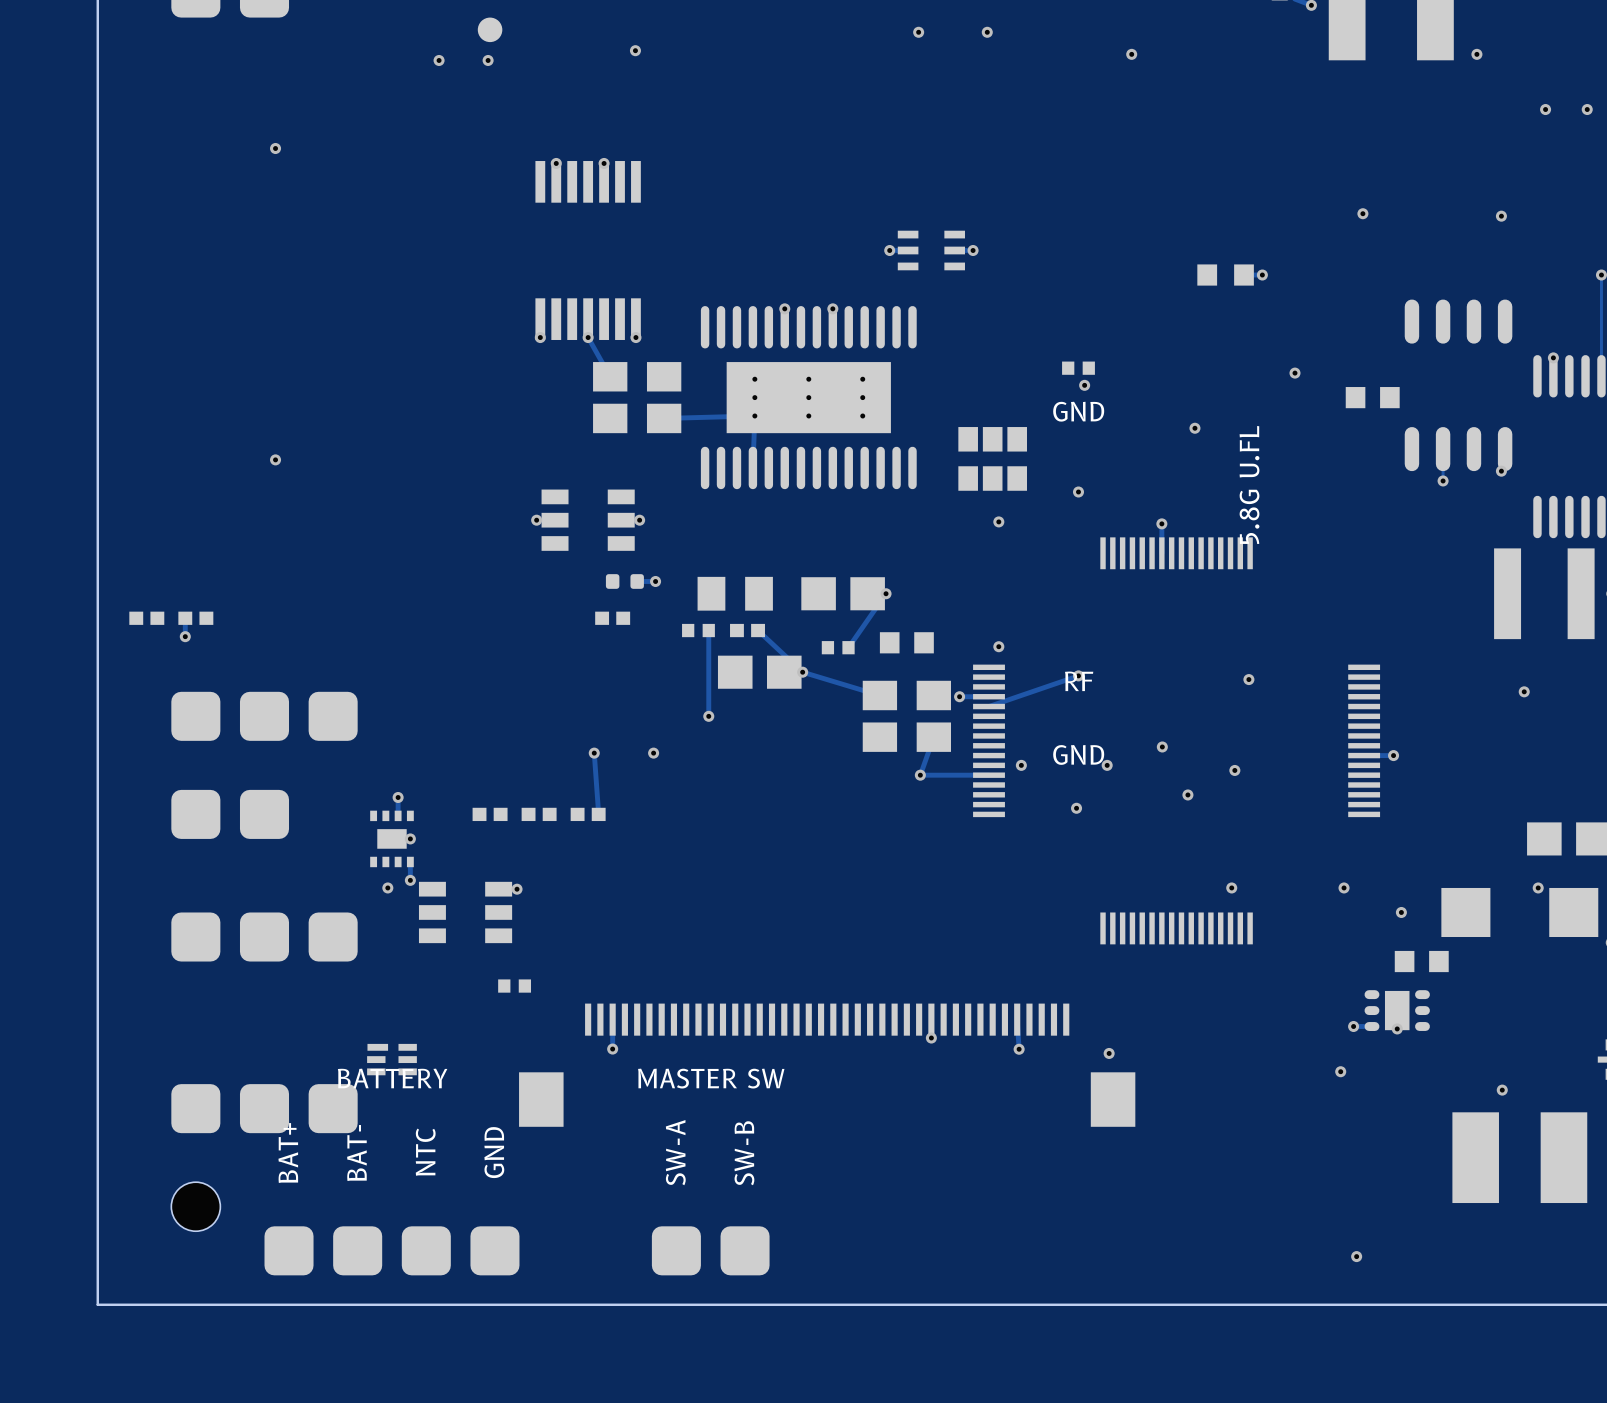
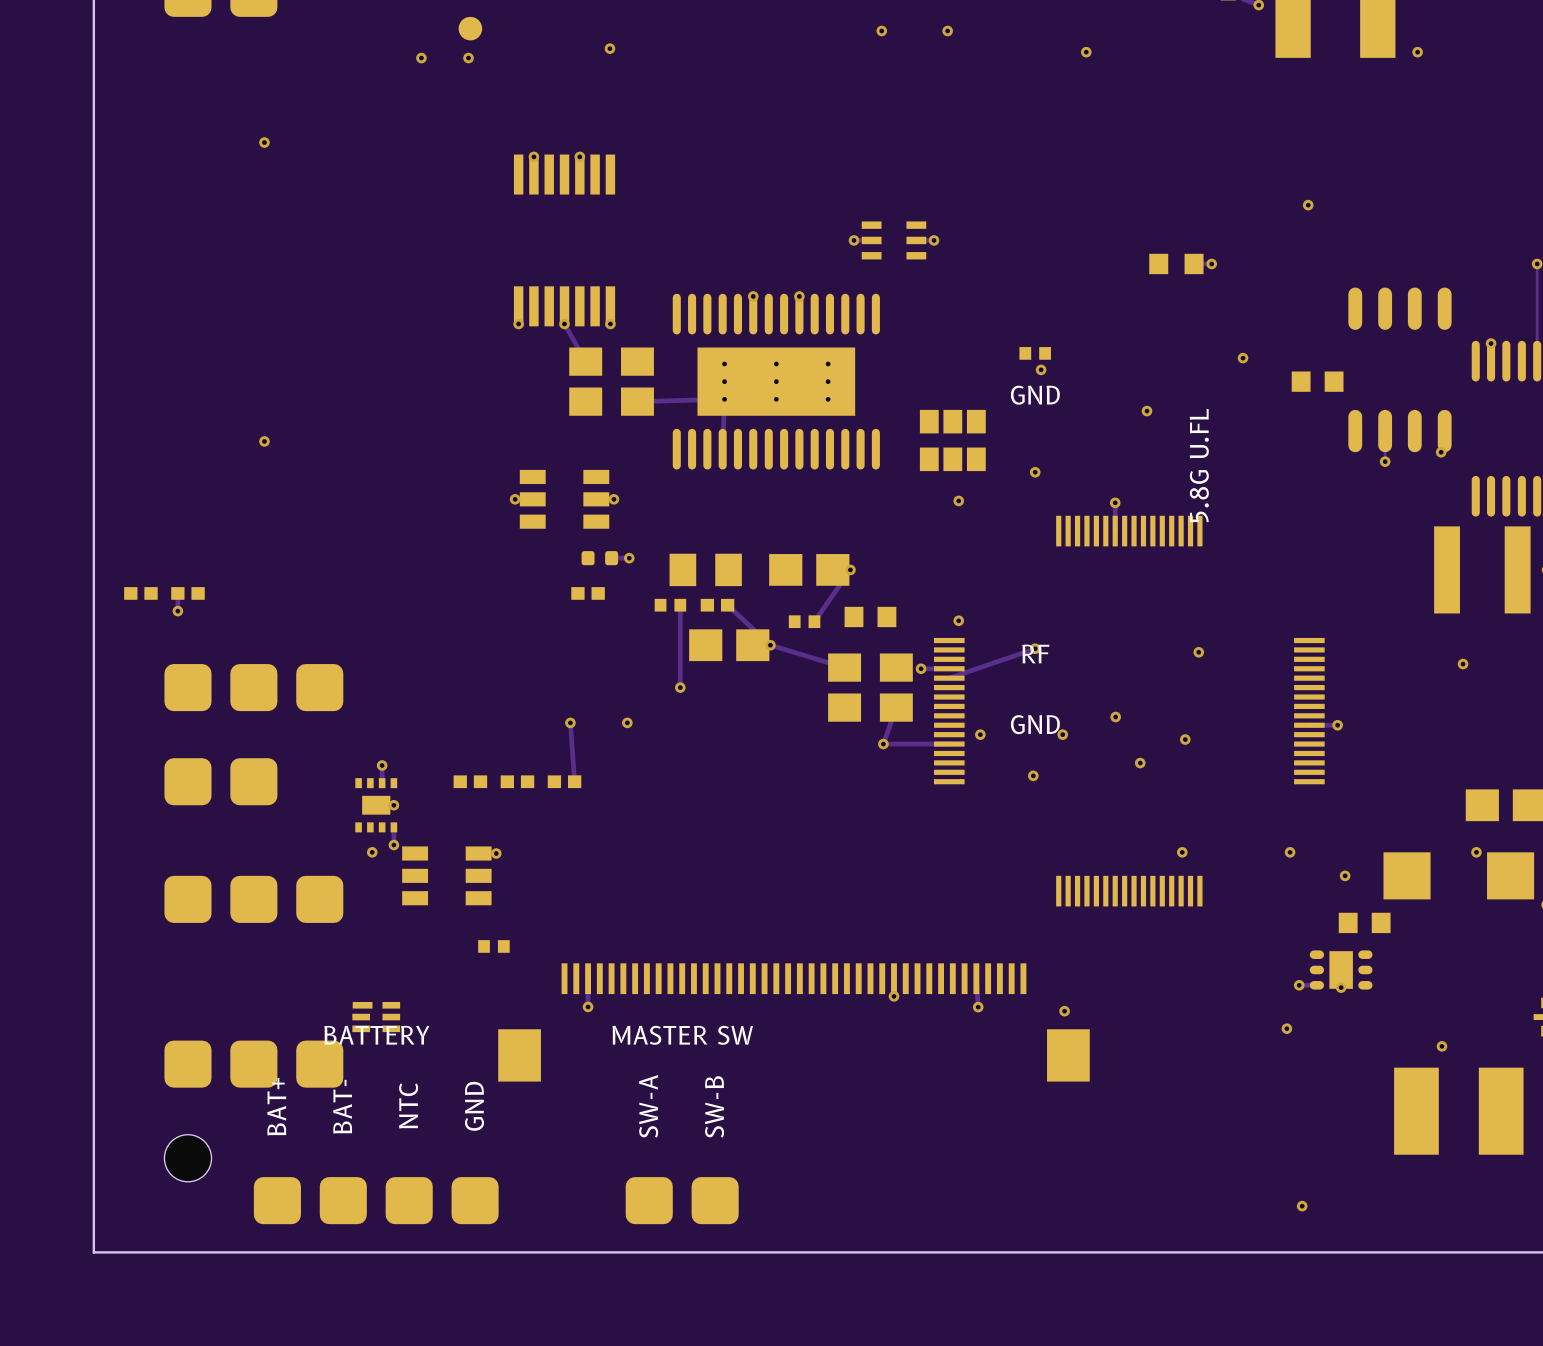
via: (1545, 109) -> none
via: (1587, 109) -> none
via: (1501, 216) -> none

